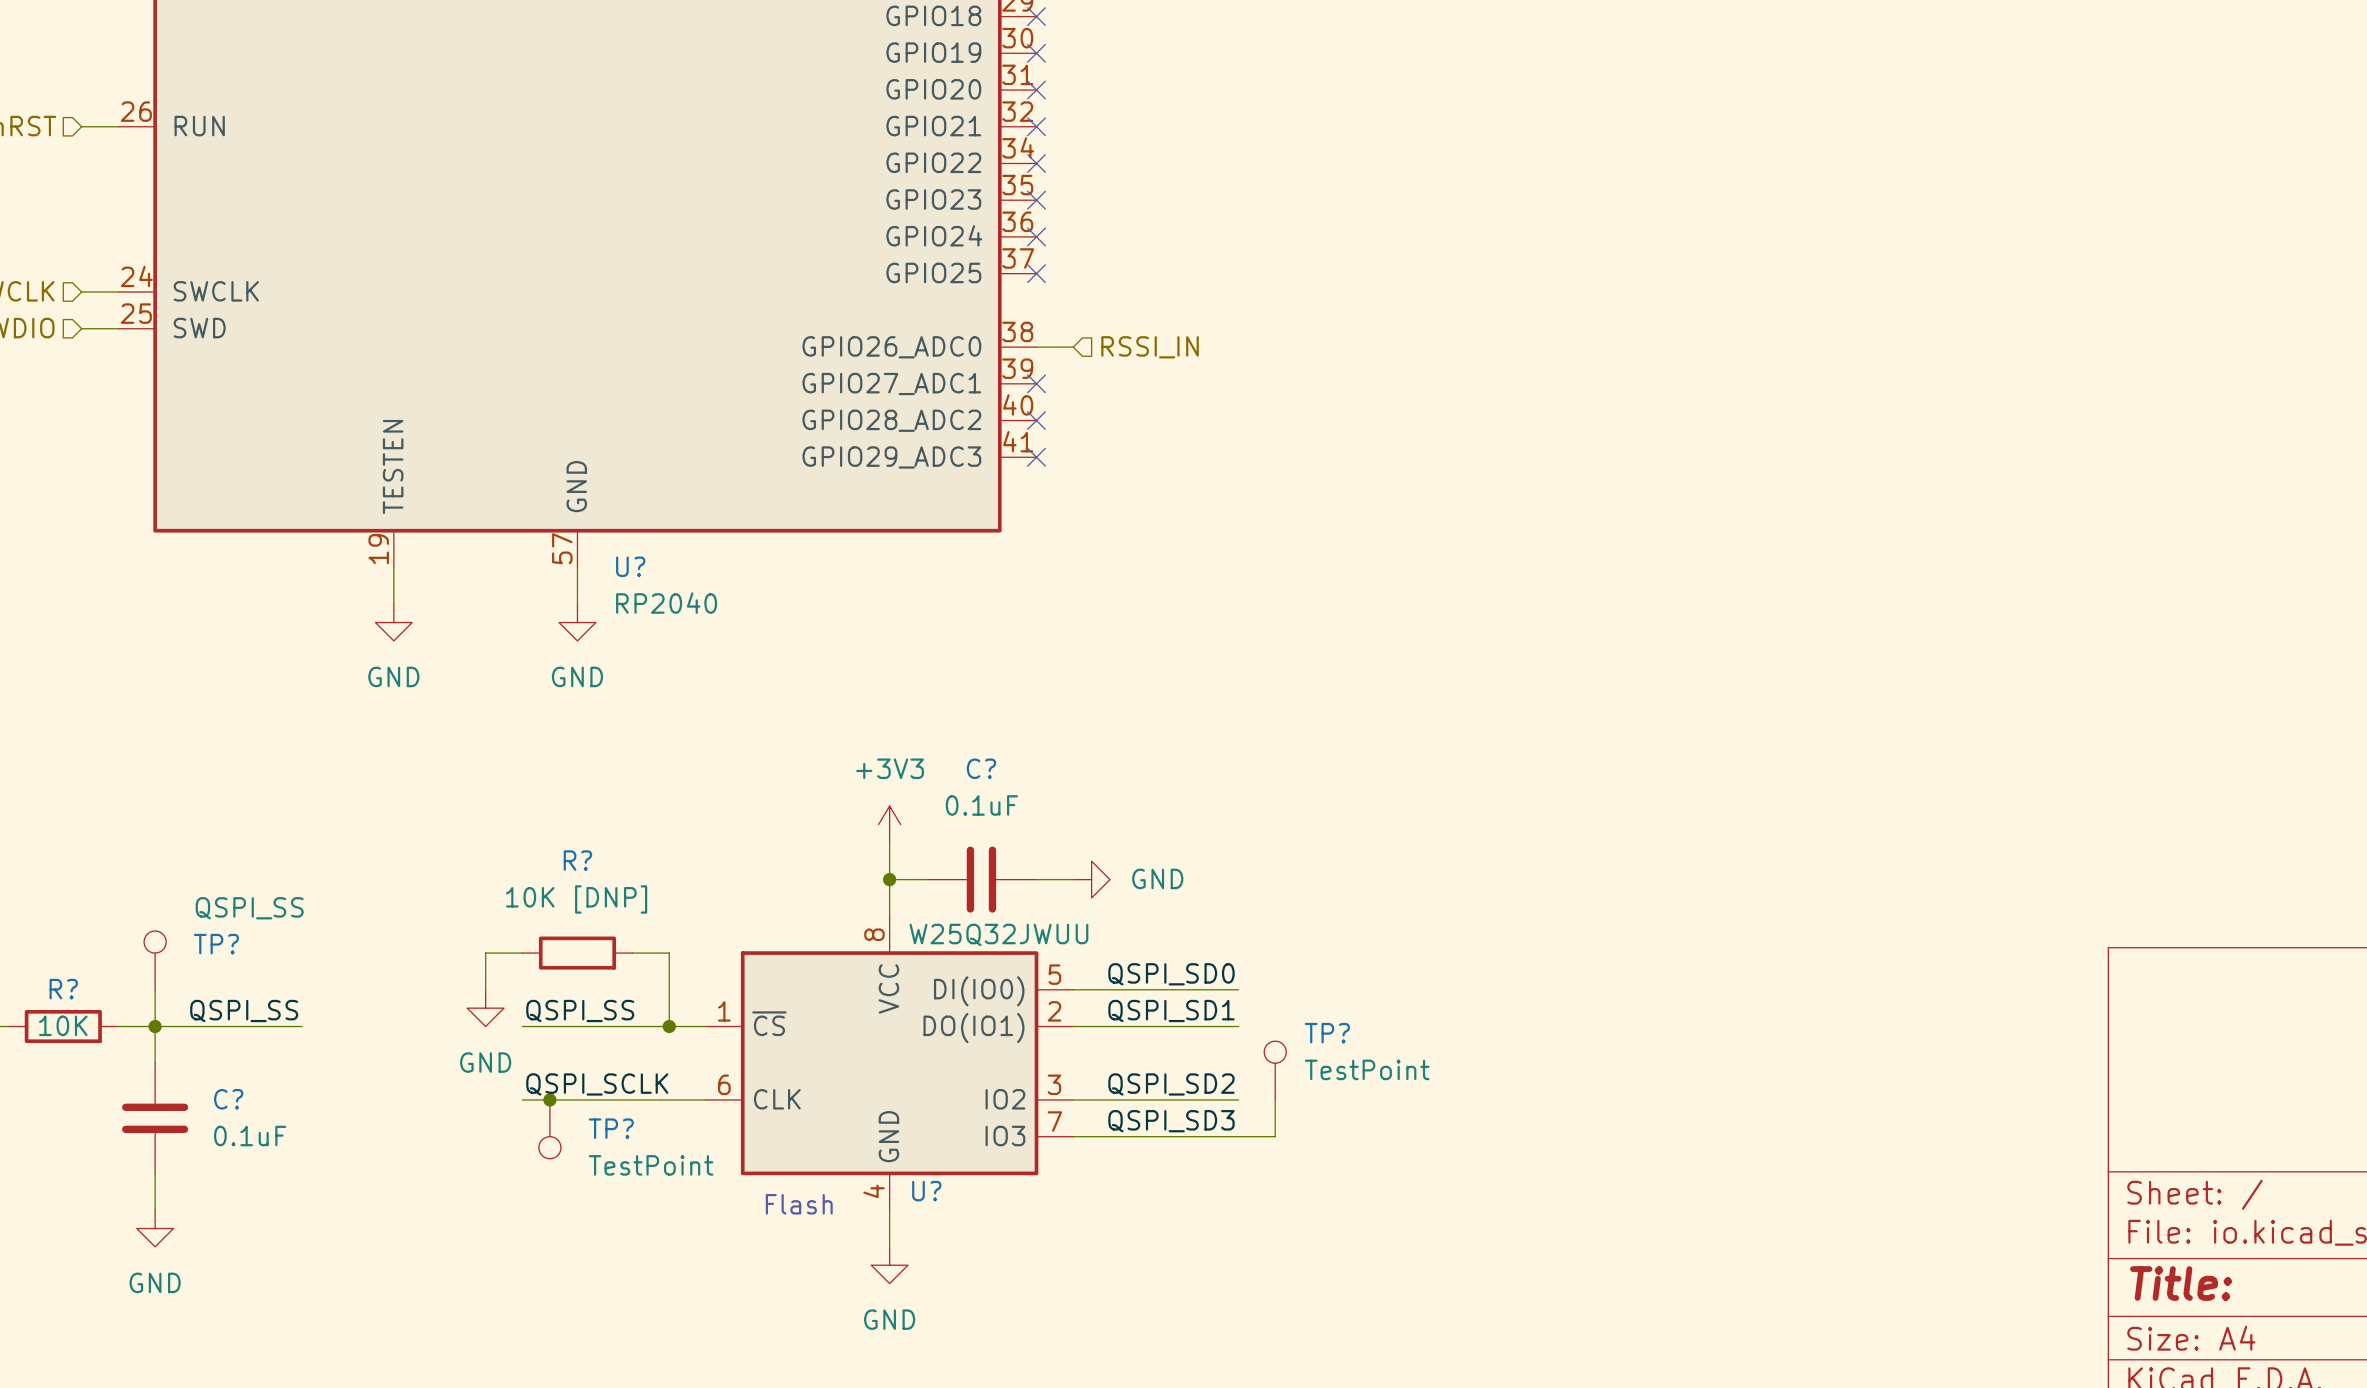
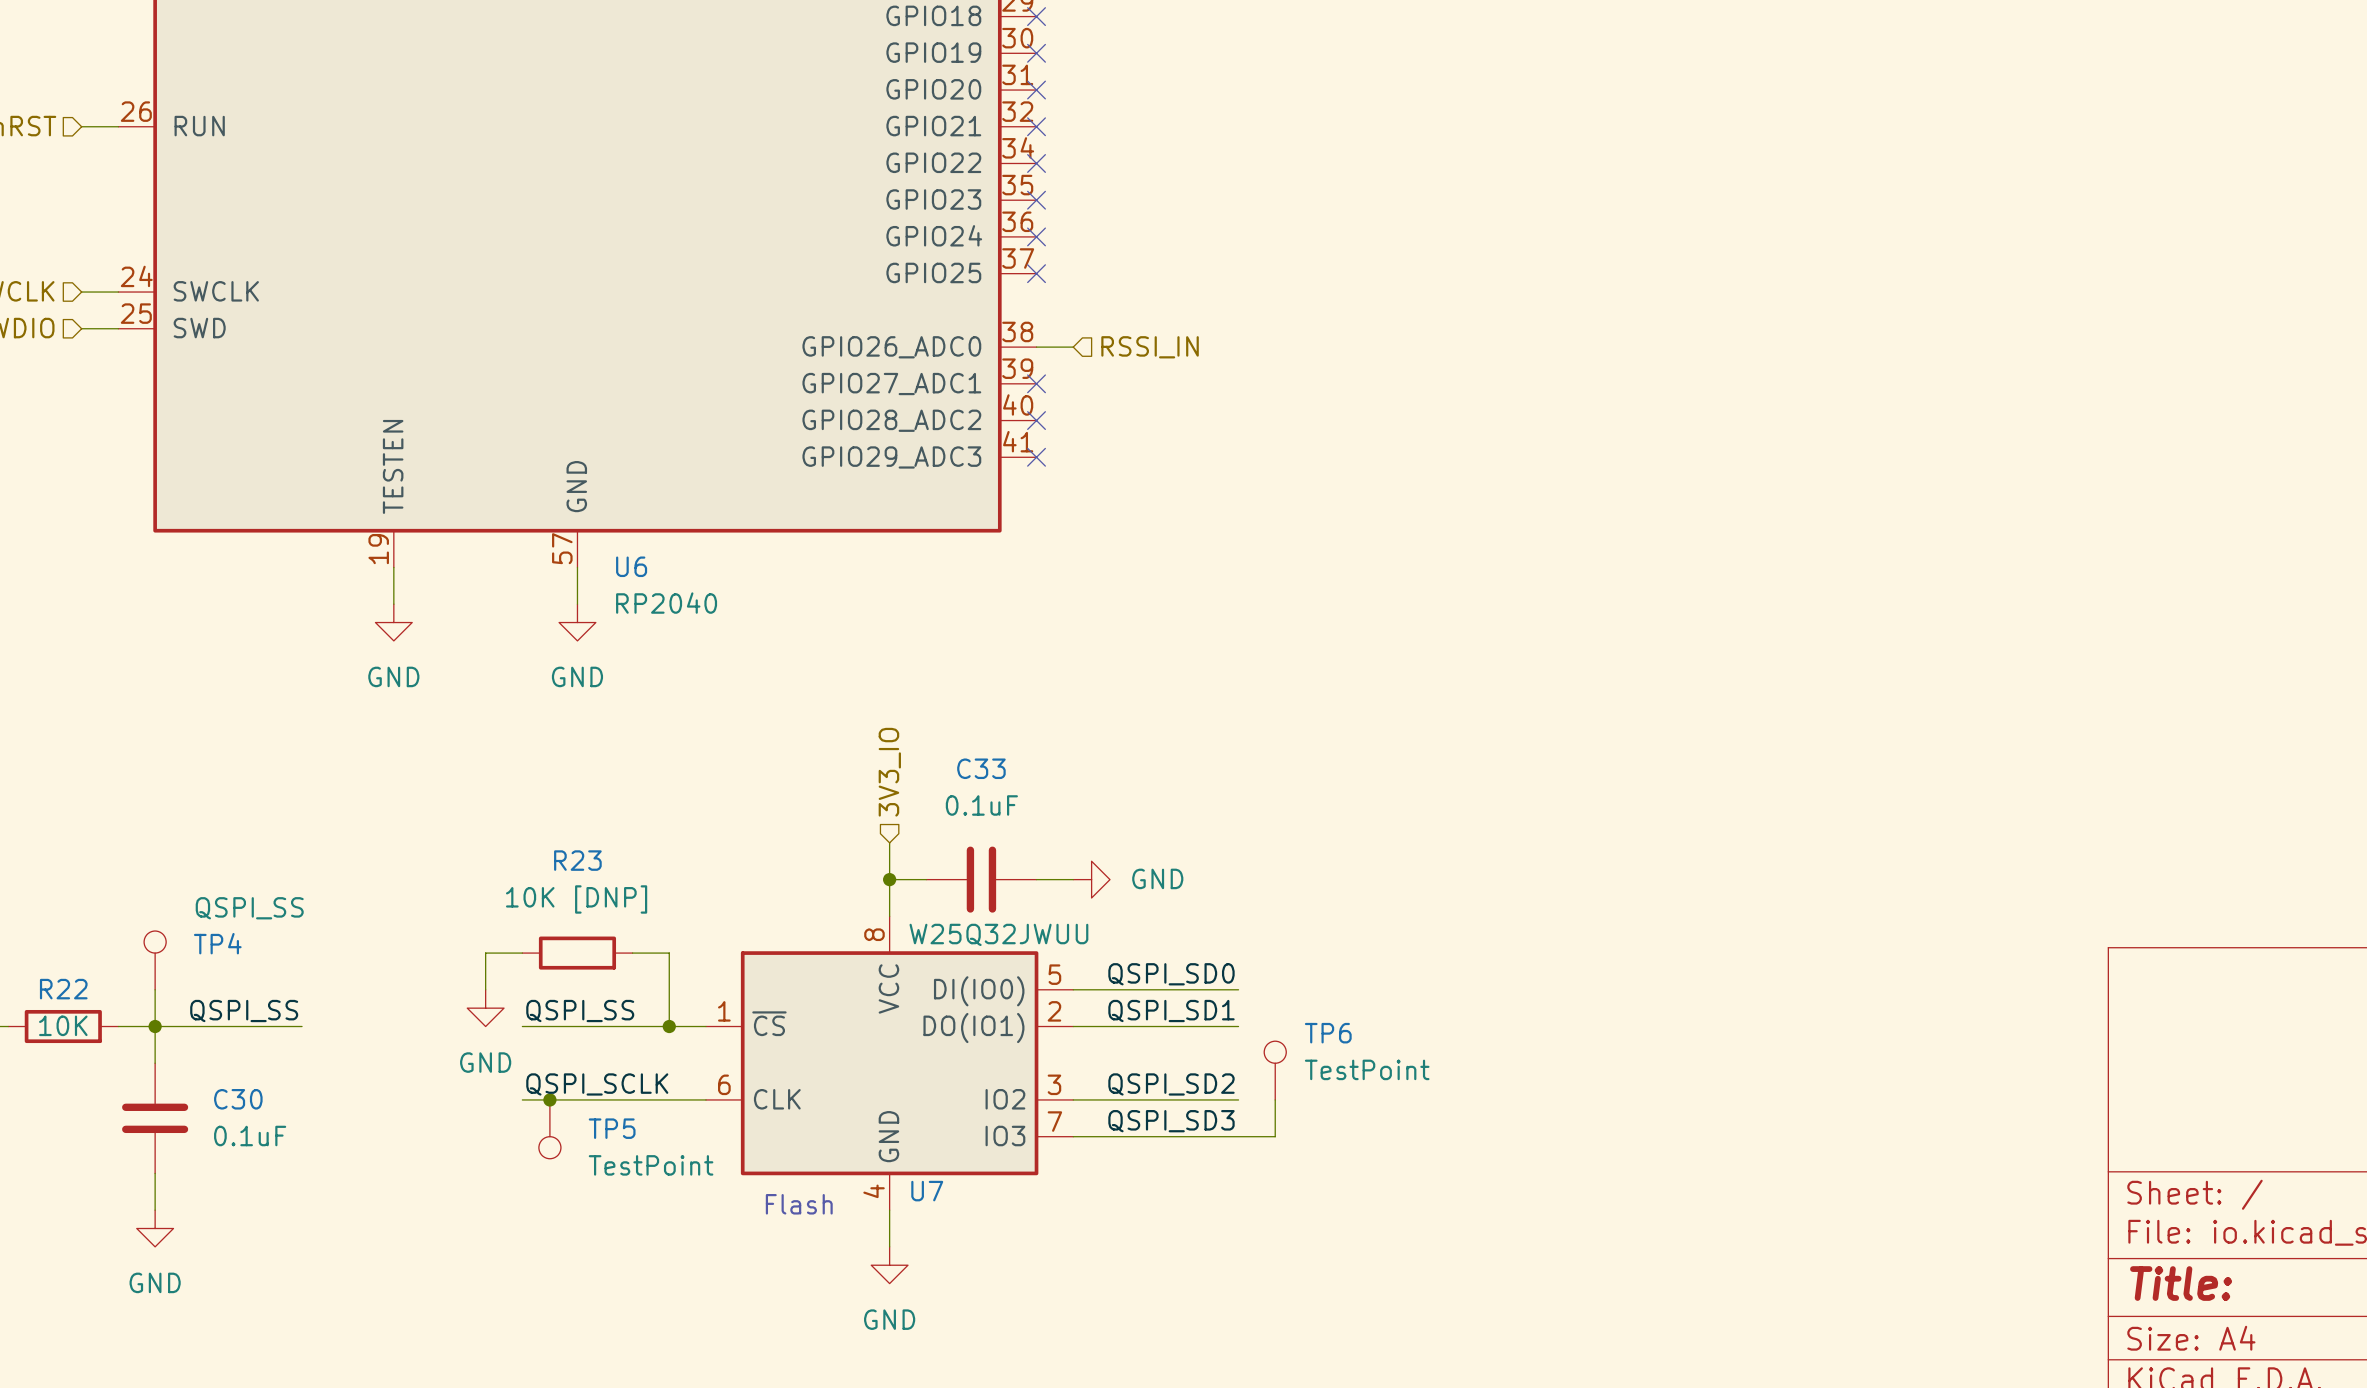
U? name: U? (630, 566) -> U6 (631, 566)
C? name: C? (981, 768) -> C33 (981, 768)
hierarchical label: none -> 3V3_IO (889, 772)
power symbol: +3V3 (889, 824) -> none
R? name: R? (577, 860) -> R23 (577, 860)
TP? name: TP? (216, 944) -> TP4 (217, 943)
R? name: R? (63, 989) -> R22 (63, 989)
TP? name: TP? (1327, 1033) -> TP6 (1328, 1033)
C? name: C? (228, 1099) -> C30 (238, 1099)
TP? name: TP? (611, 1128) -> TP5 (612, 1128)
U? name: U? (926, 1191) -> U7 (927, 1191)

